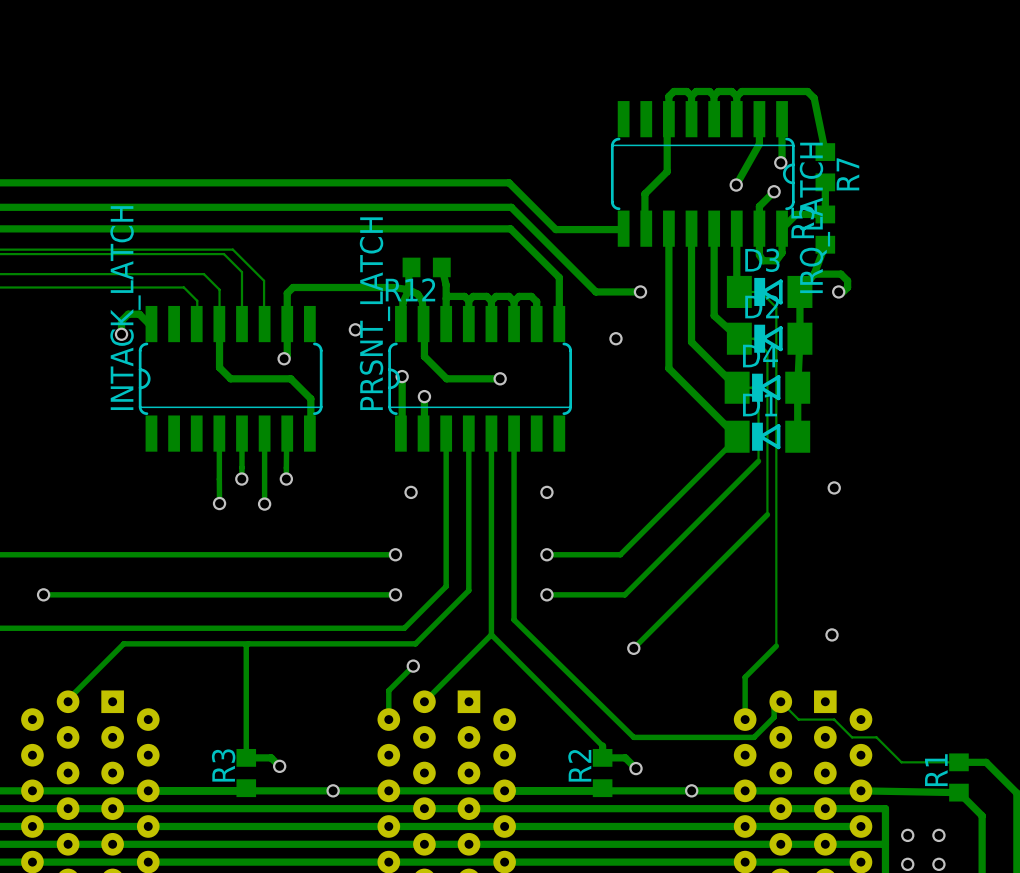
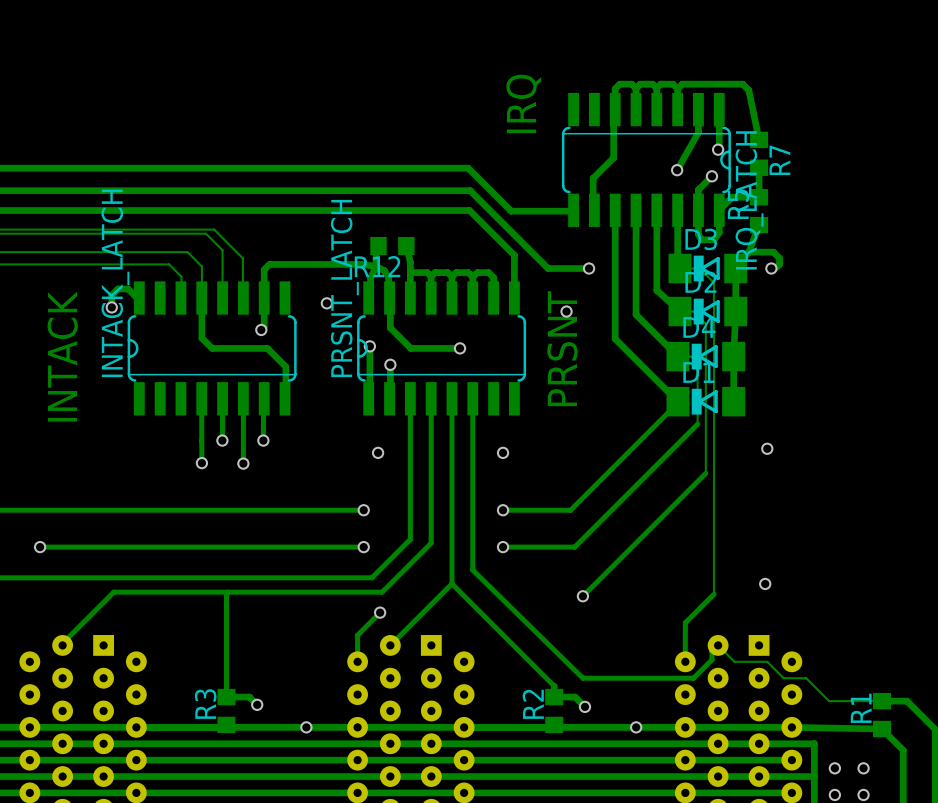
text: none -> IRQ (523, 103)
text: none -> PRSNT (562, 348)
text: none -> INTACK (62, 356)

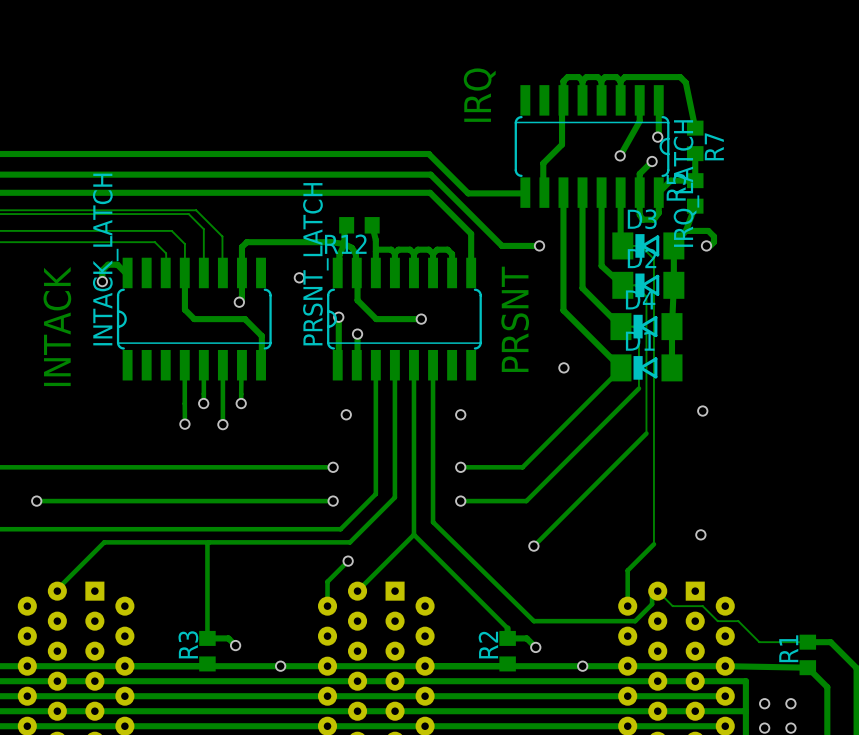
via: (566, 311) -> none
via: none -> (563, 367)

